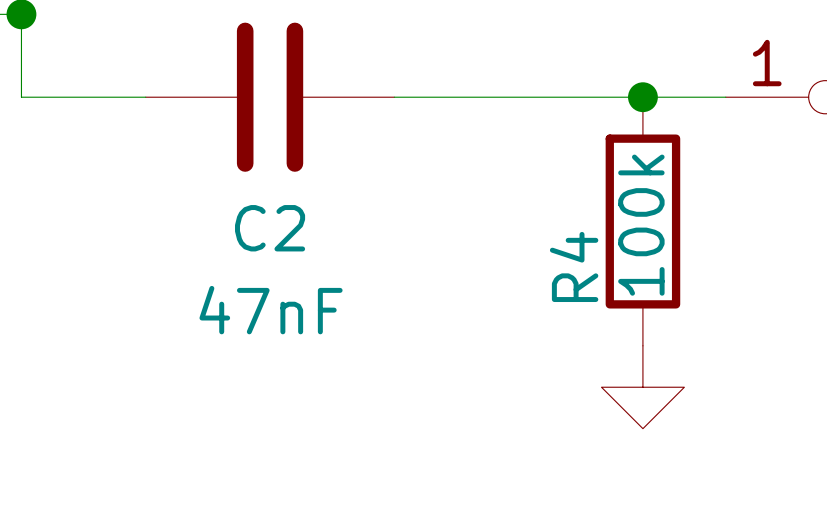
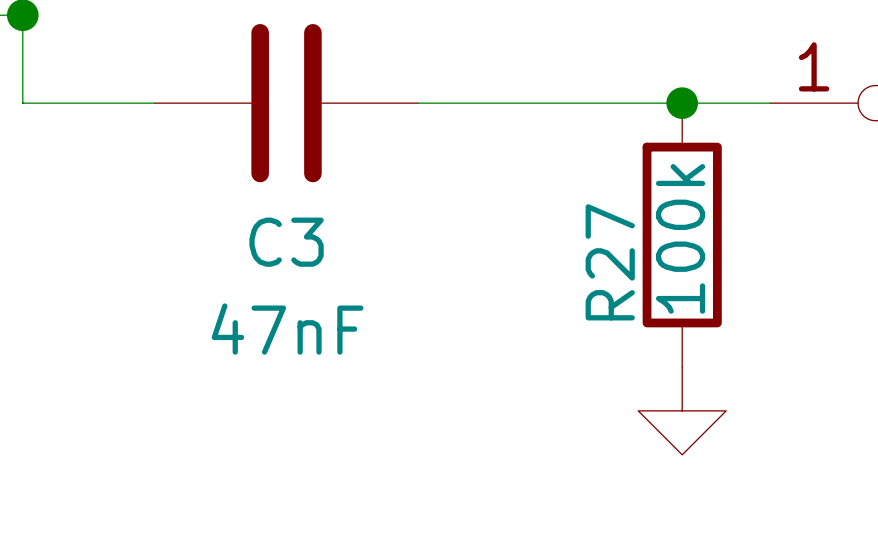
C2 name: C2 (270, 228) -> C3 (286, 242)
R4 name: R4 (574, 266) -> R27 (610, 262)

